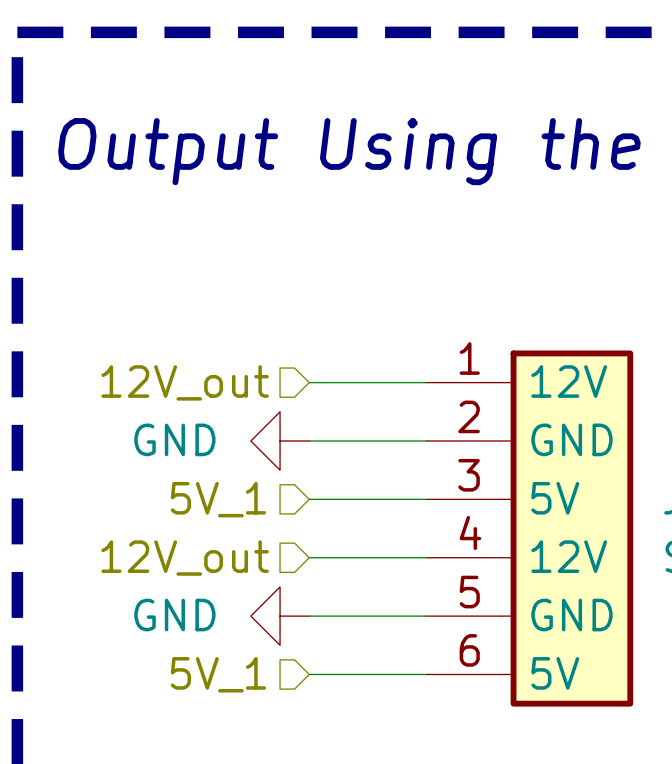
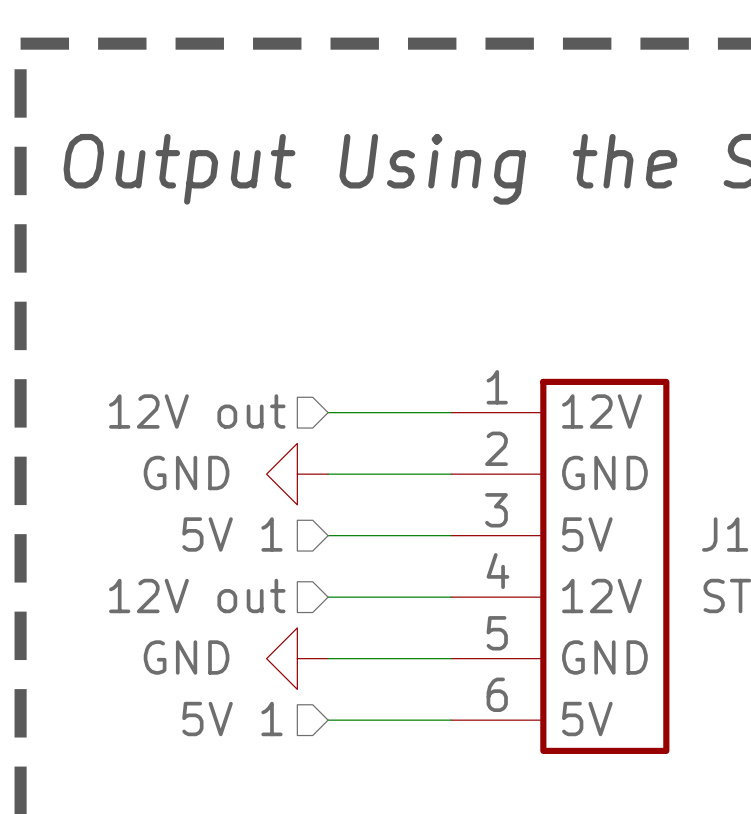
hierarchical label: 12V_out (185, 382) -> 12V out (197, 411)
hierarchical label: 5V_1 (218, 499) -> 5V 1 (232, 534)
hierarchical label: 12V_out (185, 558) -> 12V out (197, 596)
hierarchical label: 5V_1 (218, 674) -> 5V 1 (232, 719)

